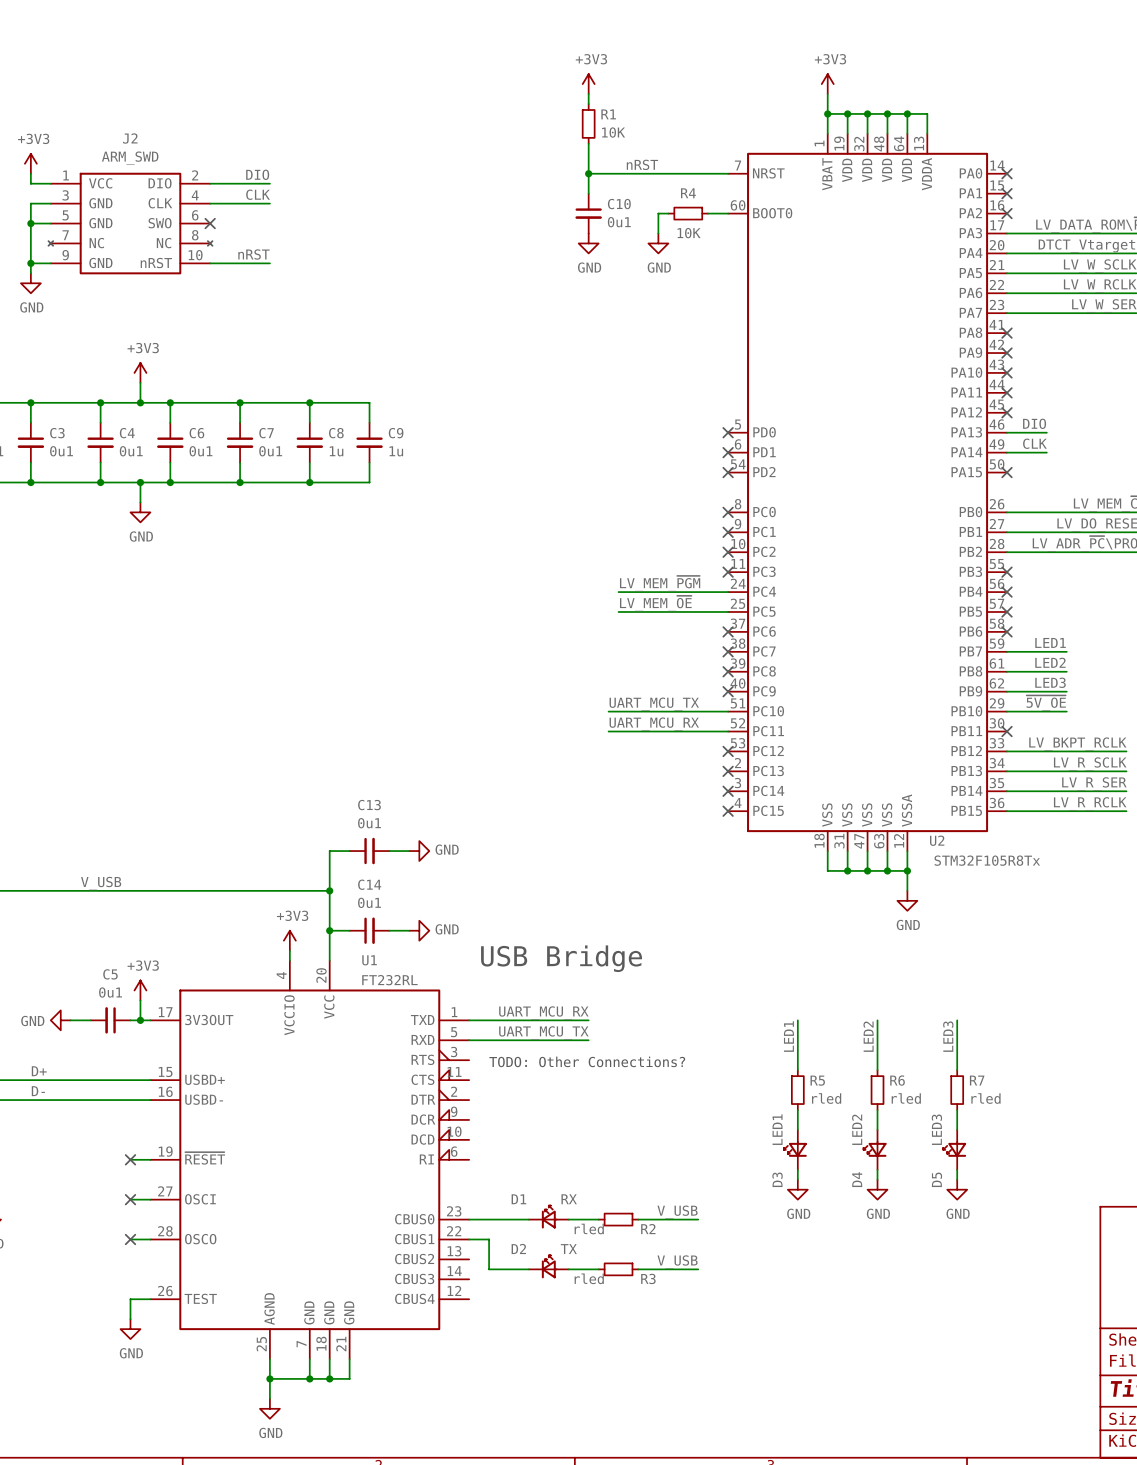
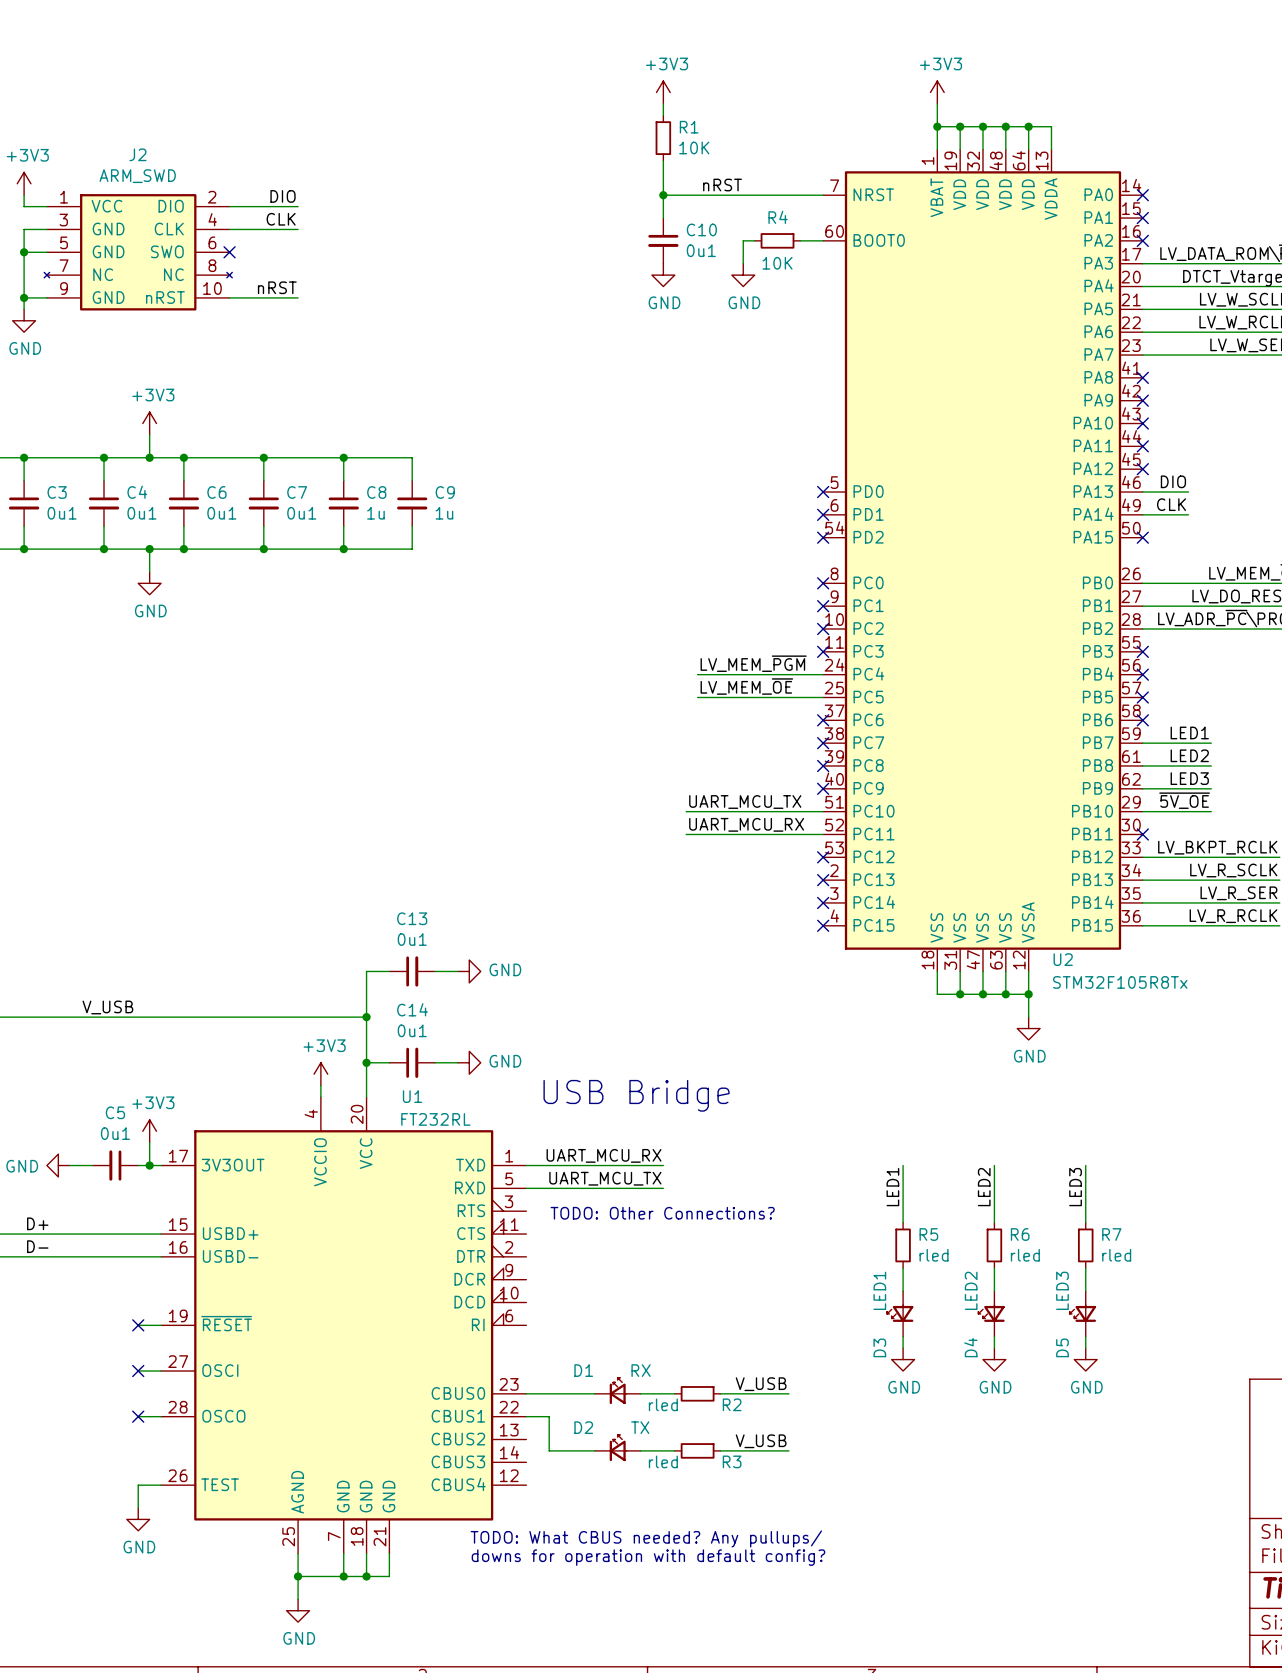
text: none -> TODO: What CBUS needed? Any pullups/ (646, 1538)
text: none -> downs for operation with default config? (648, 1557)

